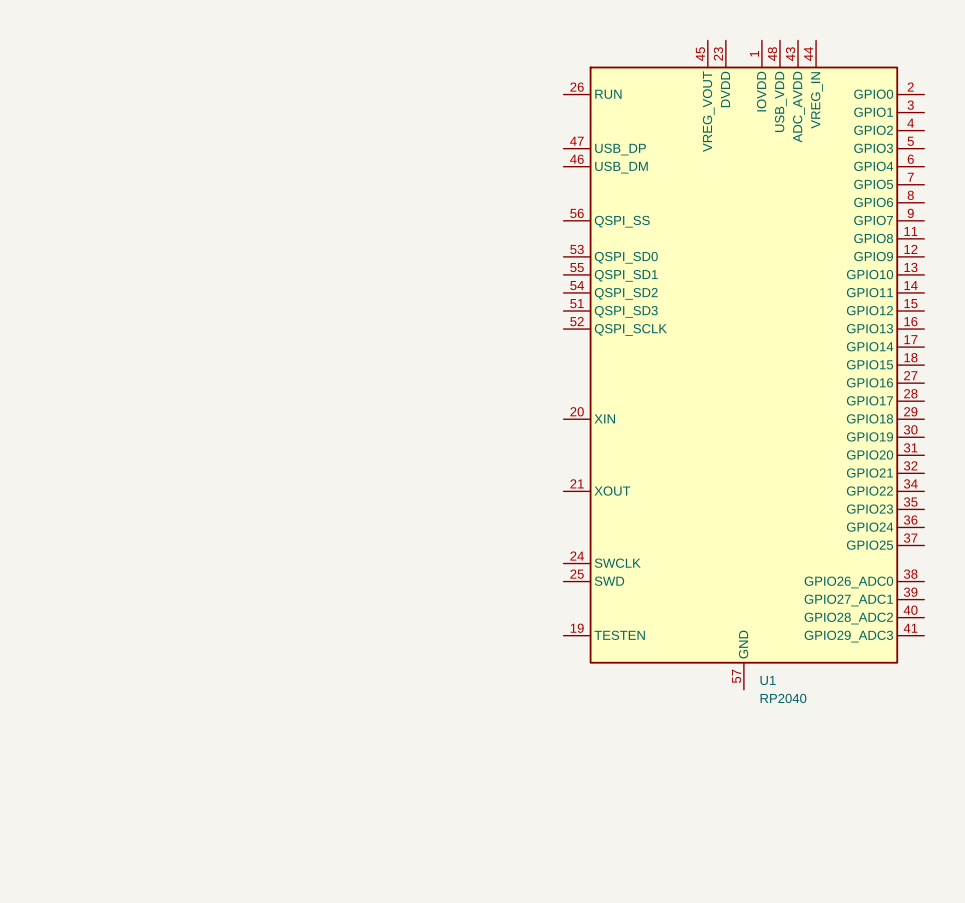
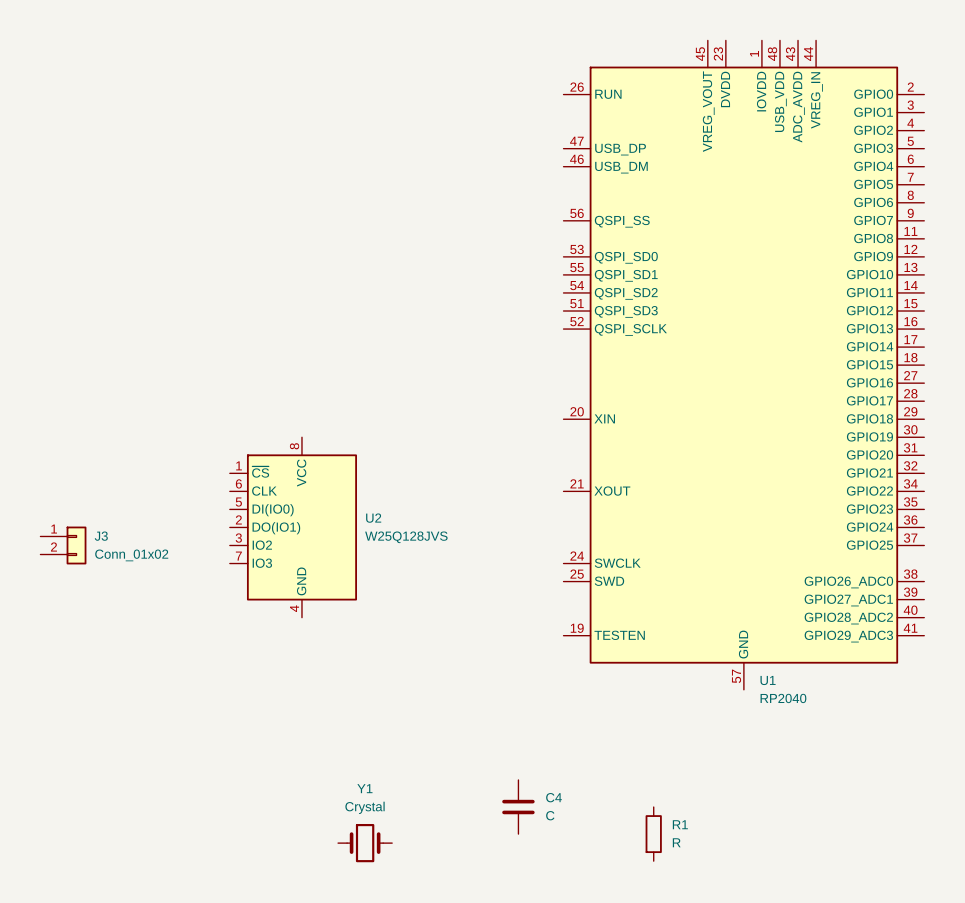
U2: none -> W25Q128JVS (293, 527)
J3: none -> Conn_01x02 (63, 545)
C4: none -> C (518, 807)
R1: none -> R (653, 834)
Y1: none -> Crystal (365, 843)

